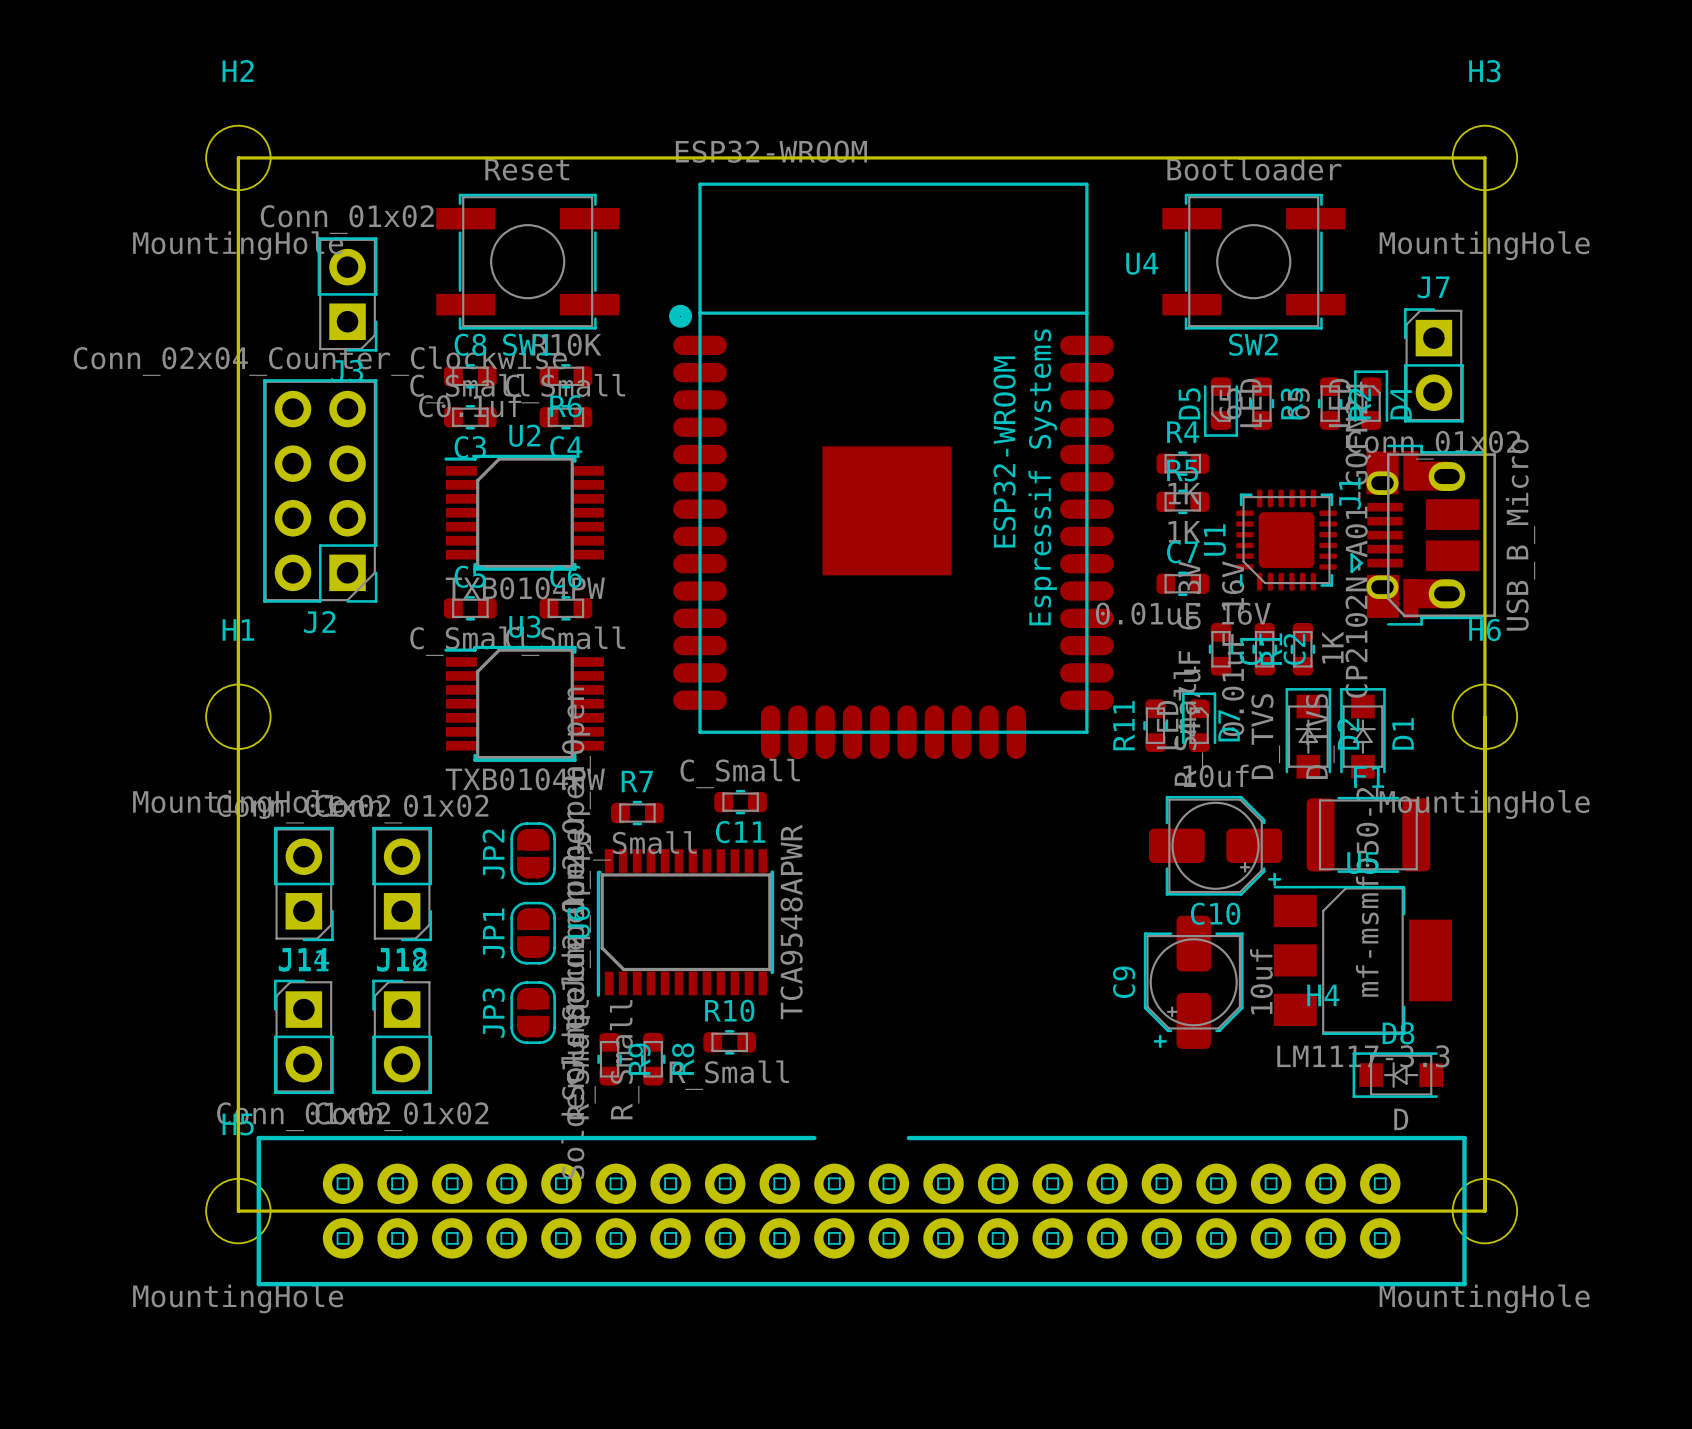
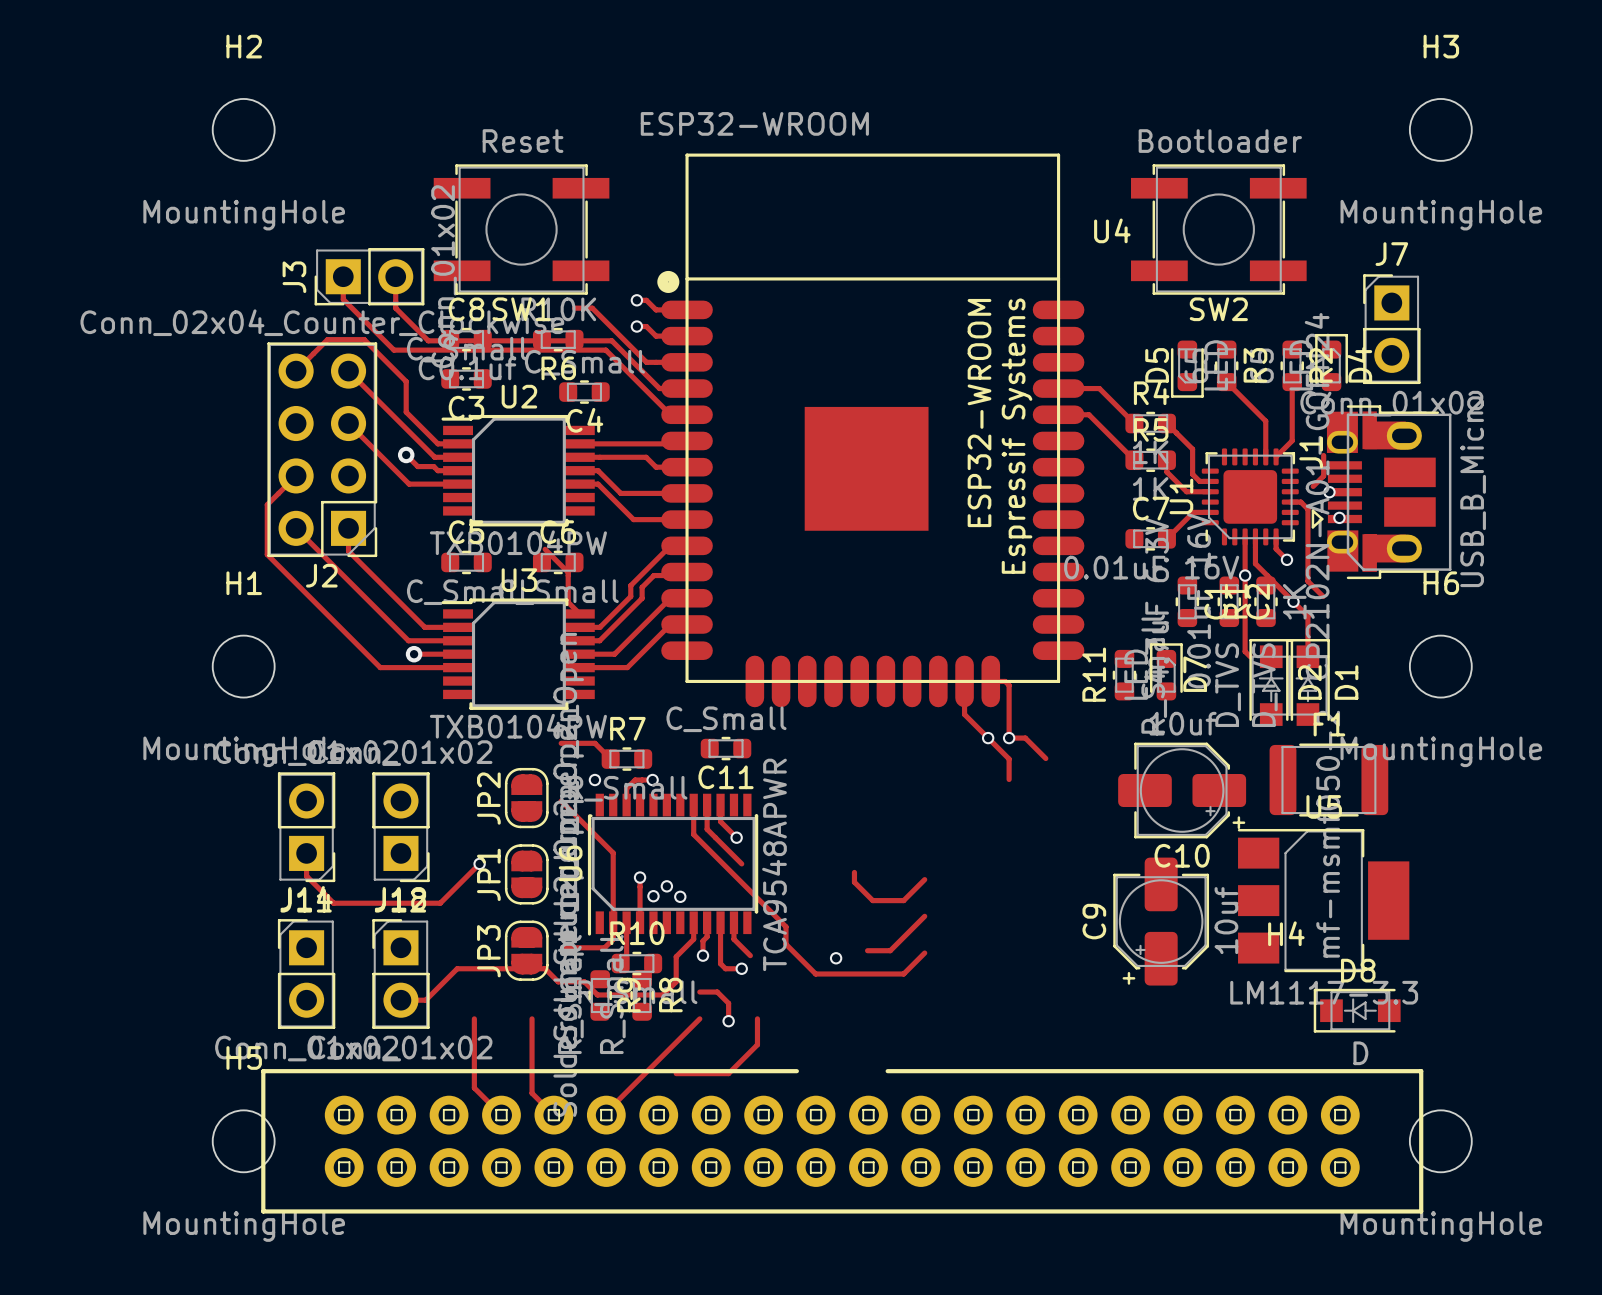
board edge: (238, 157) (238, 1211) (1484, 1211) (1484, 157) (238, 157) -> none
J3 rotation: 0° (347, 294) -> 90° clockwise (369, 276)
track: none -> (343, 276) (343, 299) (393, 350) (605, 350) (670, 414) (687, 414)
track: none -> (395, 276) (395, 308) (428, 340) (611, 340) (659, 388) (687, 388)
track: none -> (636, 300) (646, 300) (656, 309) (687, 309)
via: none -> (636, 300)
track: none -> (574, 308) (592, 308) (646, 362) (687, 362)
track: none -> (636, 326) (646, 326) (656, 336) (687, 336)
via: none -> (636, 326)
track: none -> (296, 371) (327, 339) (364, 339) (406, 381) (406, 412) (437, 443) (458, 443)
track: none -> (348, 371) (434, 457) (458, 457)
C4 position: (565, 417) -> (584, 392)
track: none -> (1226, 382) (1265, 421) (1265, 456)
track: none -> (1292, 382) (1292, 440) (1276, 456)
track: none -> (1058, 388) (1099, 388) (1134, 423)
track: none -> (1058, 414) (1088, 414) (1134, 460)
track: none -> (348, 423) (409, 484) (458, 484)
track: none -> (1166, 423) (1192, 449) (1192, 474) (1199, 481) (1210, 481)
track: none -> (687, 440) (684, 443) (579, 443)
track: none -> (406, 454) (417, 466) (433, 466) (437, 470) (458, 470)
via: none -> (406, 454)
track: none -> (1323, 455) (1323, 475) (1313, 486)
track: none -> (579, 457) (646, 457) (656, 467) (687, 467)
track: none -> (1166, 460) (1166, 472) (1186, 491) (1210, 491)
track: none -> (579, 470) (598, 470) (620, 493) (687, 493)
track: none -> (296, 475) (267, 504) (267, 554) (380, 667) (458, 667)
track: none -> (579, 484) (598, 484) (633, 519) (687, 519)
via: none -> (1329, 492)
track: none -> (1290, 502) (1300, 502) (1307, 509) (1307, 581) (1323, 596)
track: none -> (1210, 512) (1193, 512) (1166, 538)
via: none -> (1339, 517)
track: none -> (296, 528) (408, 640) (458, 640)
track: none -> (348, 528) (348, 551) (424, 627) (458, 627)
track: none -> (1245, 536) (1245, 651) (1250, 656)
track: none -> (1255, 536) (1255, 563) (1307, 616) (1307, 656)
track: none -> (1276, 536) (1276, 548) (1286, 559)
track: none -> (687, 545) (670, 545) (630, 585) (630, 596) (599, 627) (579, 627)
track: none -> (545, 549) (568, 572) (568, 602) (579, 613)
via: none -> (1286, 559)
track: none -> (687, 572) (683, 575) (653, 575) (642, 587) (642, 598) (599, 640) (579, 640)
via: none -> (1245, 575)
track: none -> (687, 598) (670, 598) (614, 654) (579, 654)
via: none -> (1293, 601)
track: none -> (687, 624) (670, 624) (627, 667) (579, 667)
track: none -> (414, 654) (458, 654)
via: none -> (414, 654)
track: none -> (964, 681) (964, 714) (1009, 759) (1009, 779)
track: none -> (990, 681) (1005, 681) (1009, 685) (1009, 738) (1025, 738) (1045, 758)
D1 position: (1362, 733) -> (1307, 682)
via: none -> (988, 738)
via: none -> (1009, 738)
track: none -> (561, 743) (594, 743) (610, 759)
via: none -> (594, 780)
track: none -> (652, 780) (635, 780) (626, 788) (626, 805)
via: none -> (652, 780)
track: none -> (561, 800) (613, 853) (613, 939) (604, 947) (564, 947)
track: none -> (693, 805) (693, 834) (785, 926) (785, 944) (815, 974) (903, 974) (924, 953)
track: none -> (707, 805) (707, 829) (741, 863)
track: none -> (720, 805) (720, 821) (736, 837)
via: none -> (736, 837)
track: none -> (306, 853) (306, 876) (333, 903) (440, 903) (479, 863)
via: none -> (479, 863)
track: none -> (854, 872) (854, 882) (872, 900) (903, 900) (924, 879)
track: none -> (640, 877) (640, 922)
via: none -> (640, 877)
via: none -> (666, 886)
via: none -> (653, 896)
via: none -> (680, 896)
track: none -> (924, 916) (890, 950) (867, 950)
track: none -> (626, 922) (626, 957) (620, 963)
track: none -> (693, 922) (693, 939) (676, 956) (676, 981) (663, 994) (597, 994) (584, 981) (558, 981) (545, 968) (457, 968) (425, 1000) (400, 1000)
track: none -> (707, 922) (707, 936) (703, 940) (703, 955)
track: none -> (720, 922) (720, 963) (725, 968) (741, 968)
track: none -> (733, 922) (733, 939) (750, 955)
via: none -> (703, 955)
via: none -> (836, 958)
via: none -> (741, 968)
R10 position: (729, 1042) -> (636, 963)
track: none -> (699, 992) (717, 992) (728, 1003) (728, 1021)
track: none -> (474, 1018) (474, 1087) (501, 1115)
track: none -> (532, 1018) (532, 1093) (553, 1115)
track: none -> (699, 1018) (606, 1112) (606, 1115)
track: none -> (757, 1018) (757, 1044) (728, 1073) (676, 1073)
via: none -> (728, 1021)

